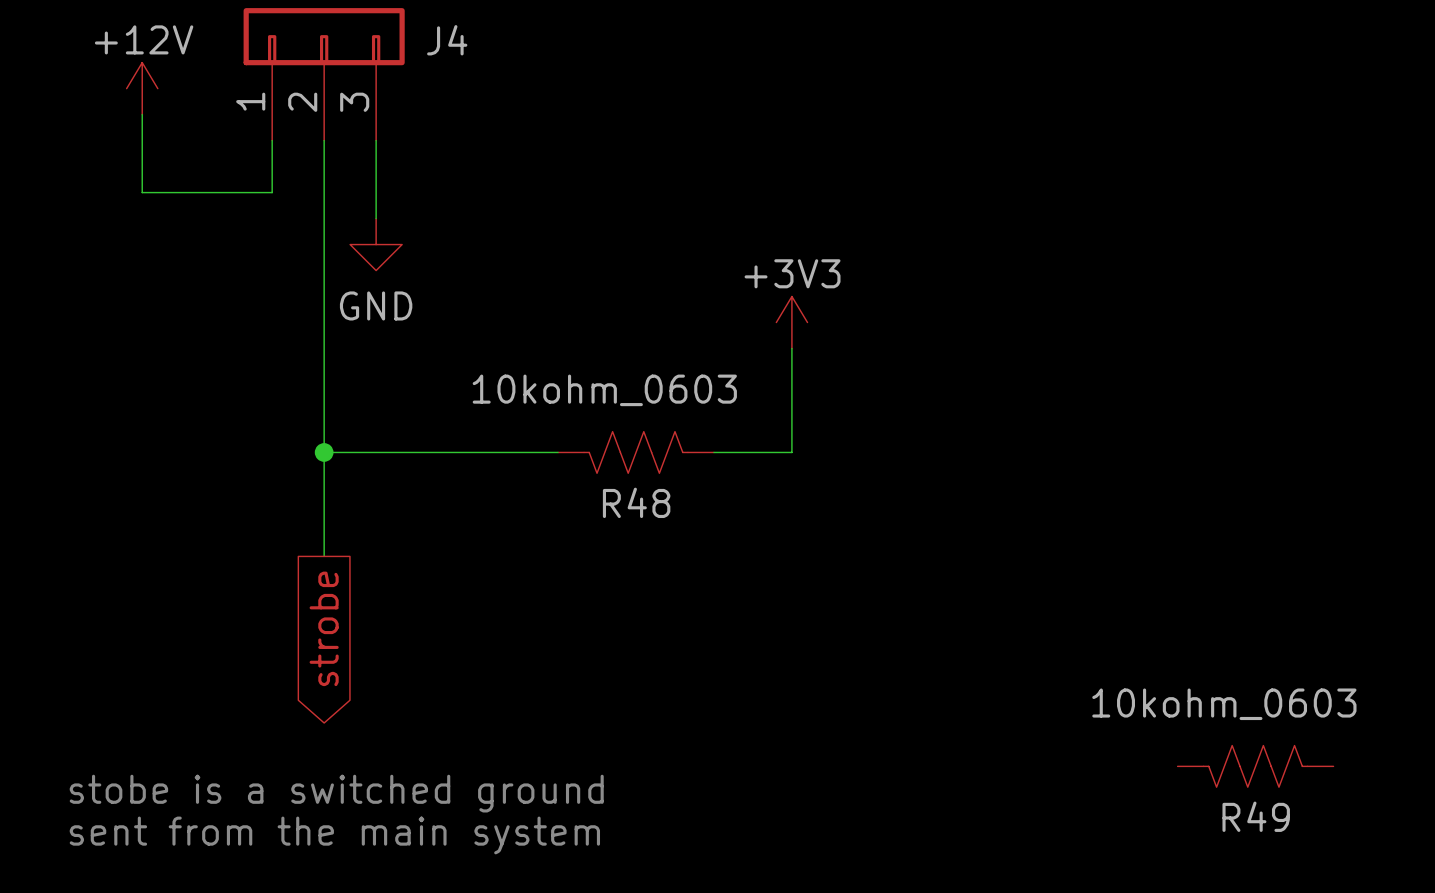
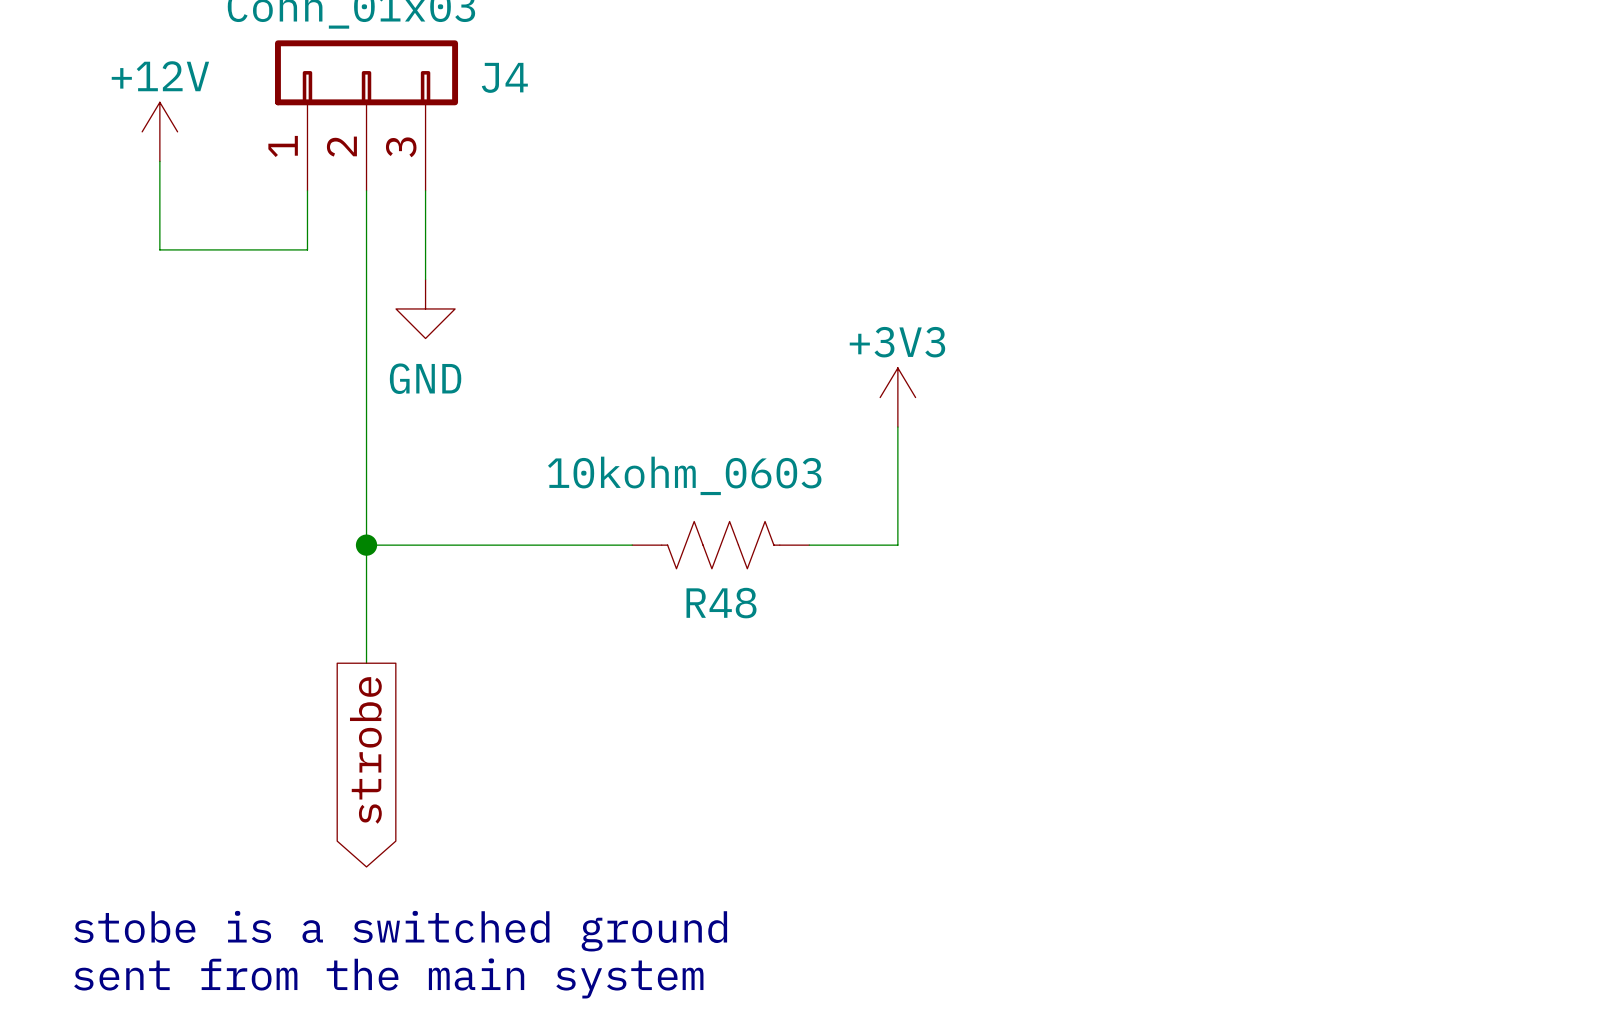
R49: 10kohm_0603 (1255, 766) -> none

